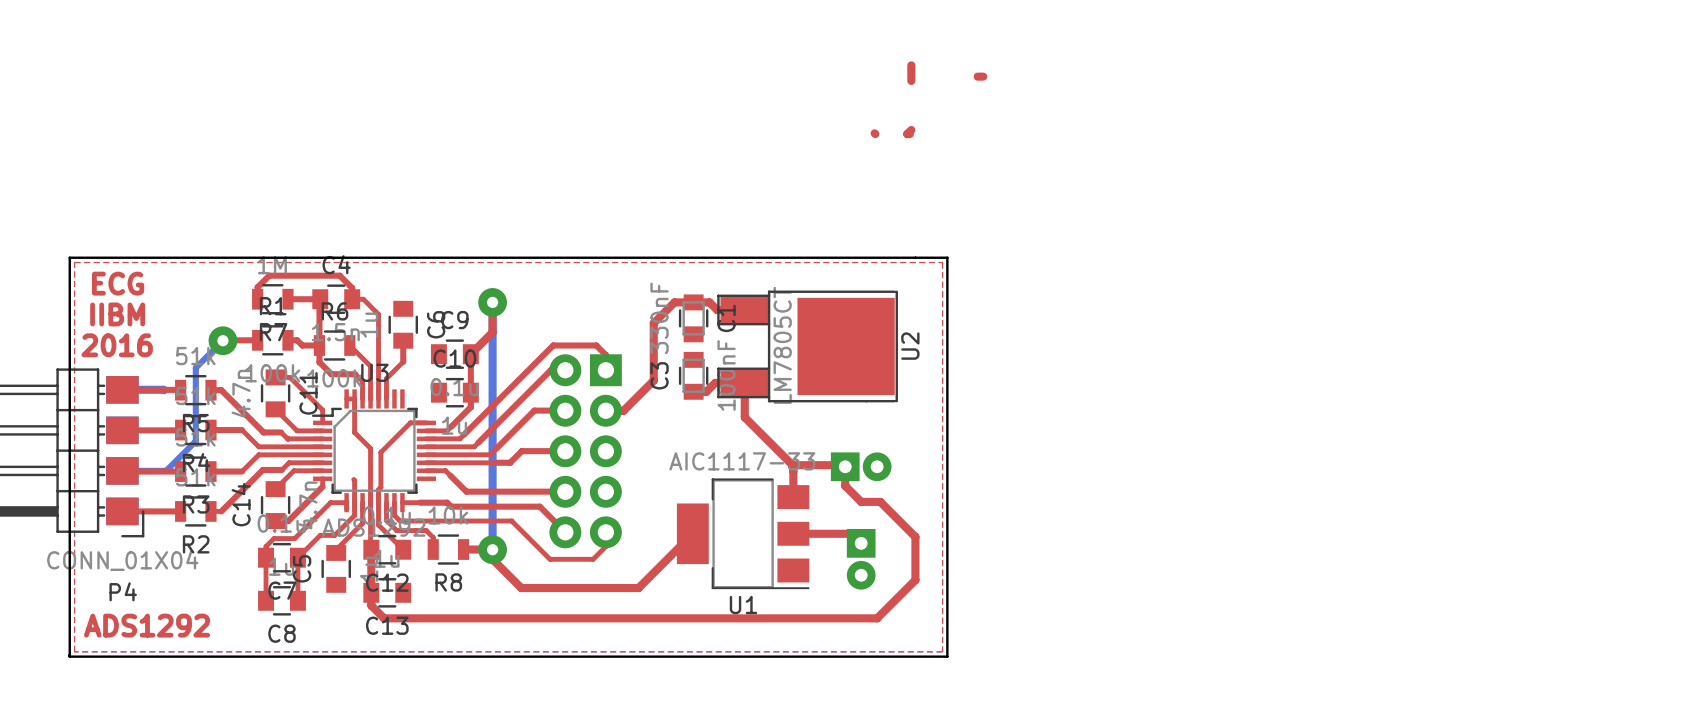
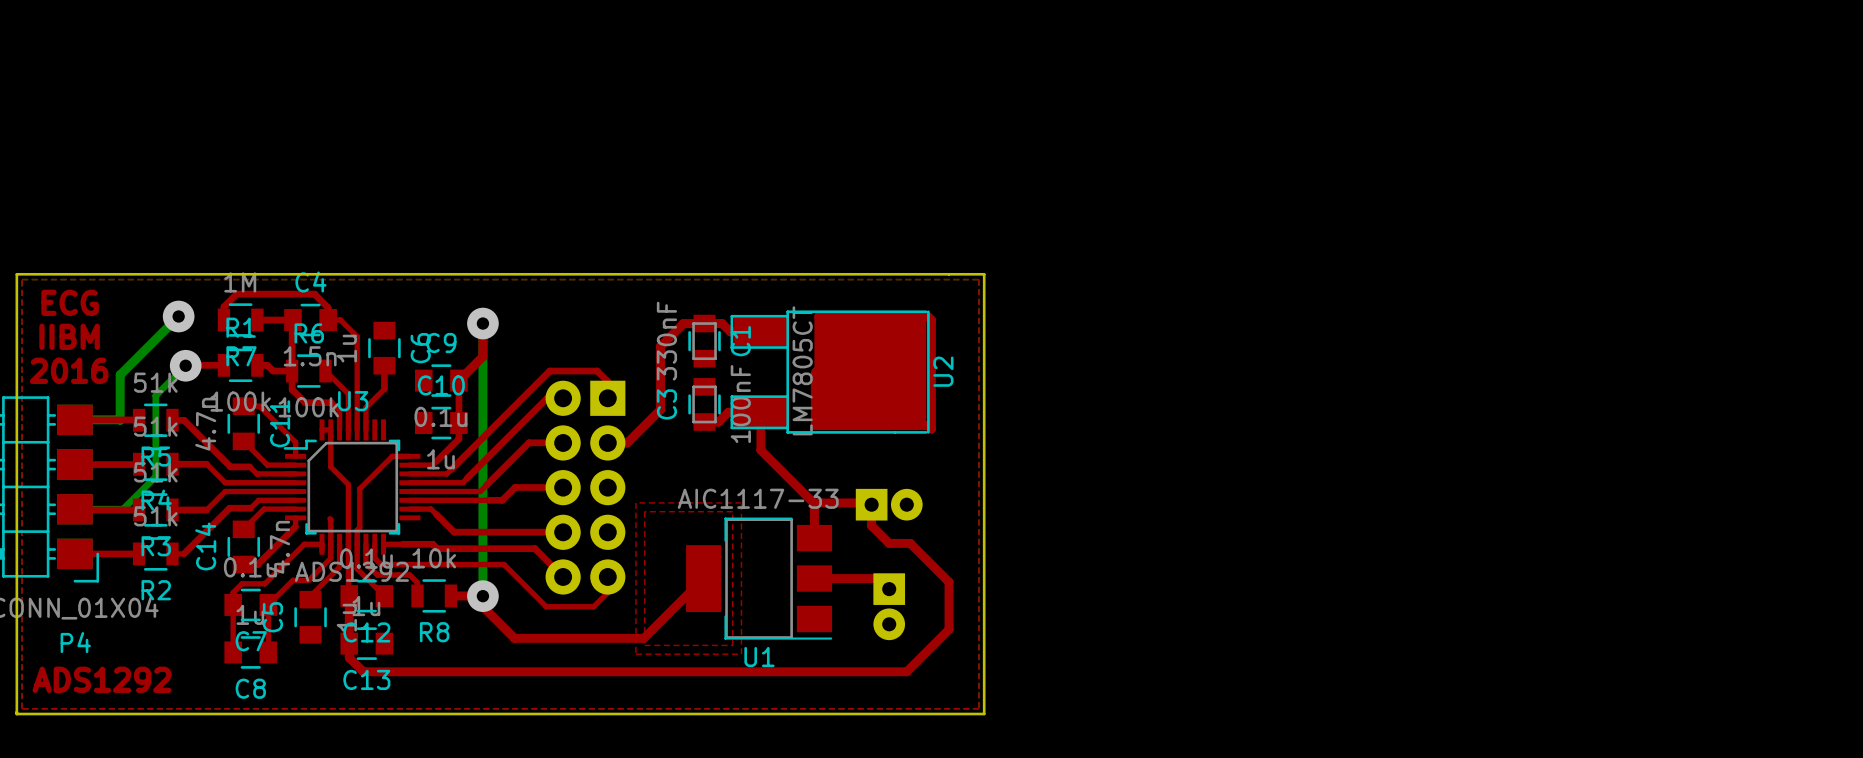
top track: (911, 65) (911, 80) -> none
top track: (977, 76) (983, 76) -> none
top track: (911, 129) (907, 134) (909, 134) -> none
top track: (874, 133) (875, 134) -> none
bottom track: none -> (178, 316) (120, 374) (120, 419)
via: none -> (178, 316)
top track: none -> (872, 372) (816, 372) (818, 369) (818, 316) (927, 316) (931, 320) (931, 429) (927, 425) (815, 425) (815, 372)
top zone outline: none -> (635, 502) (635, 654) (741, 654) (741, 502) (635, 502)
top zone outline: none -> (644, 511) (732, 511) (732, 645) (644, 645) (644, 511)

